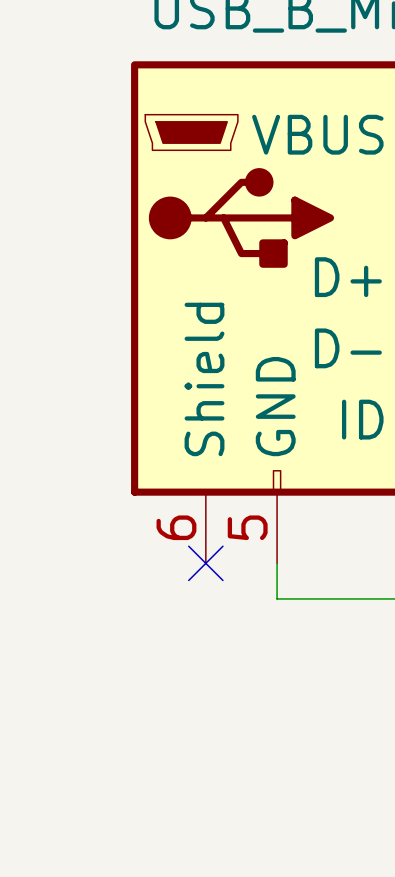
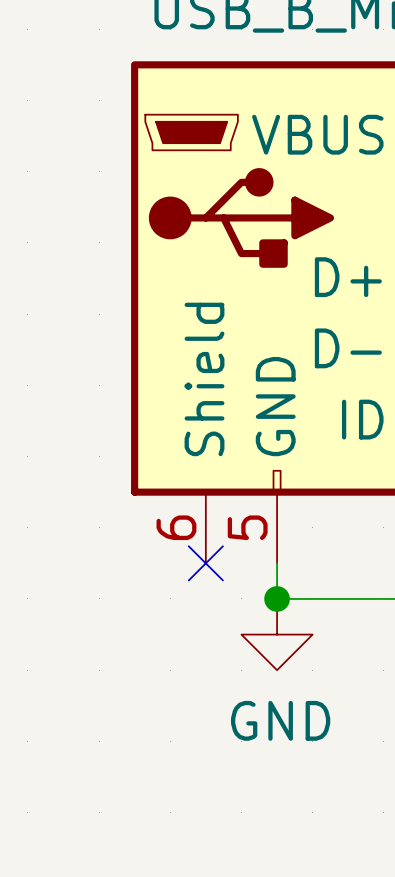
junction: none -> (277, 598)
power symbol: none -> GND (277, 634)

